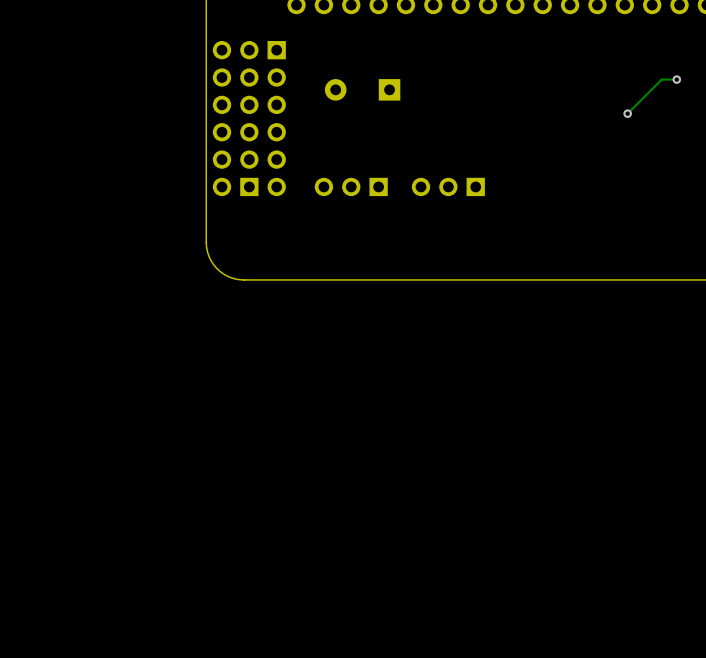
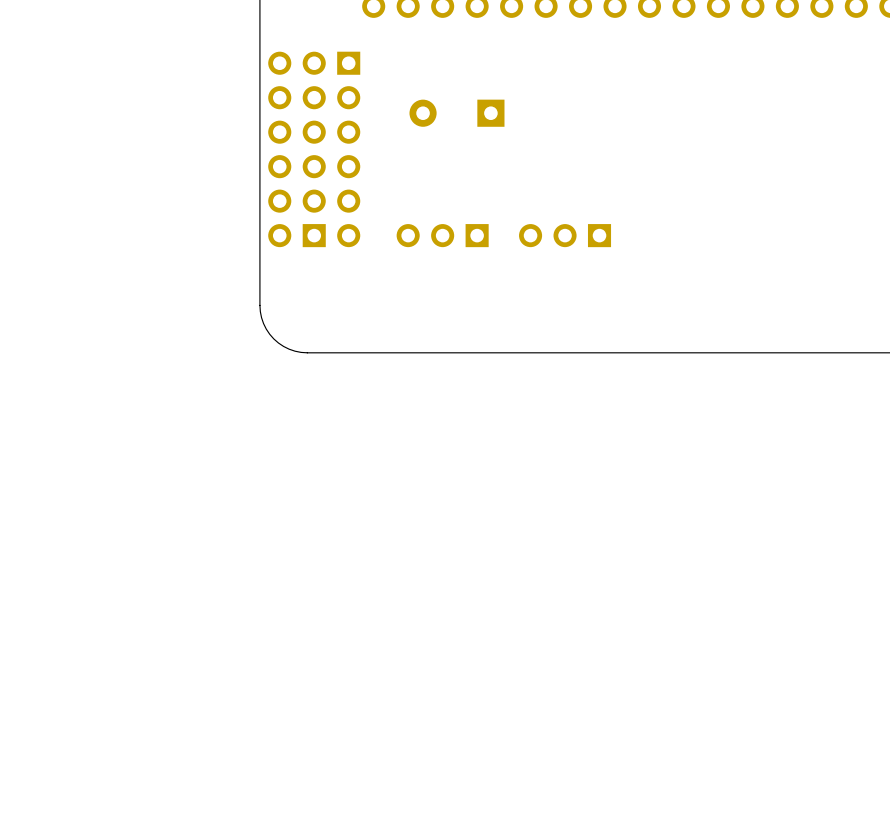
track: (676, 79) (661, 79) (627, 113) -> none
via: (676, 79) -> none
via: (627, 113) -> none

